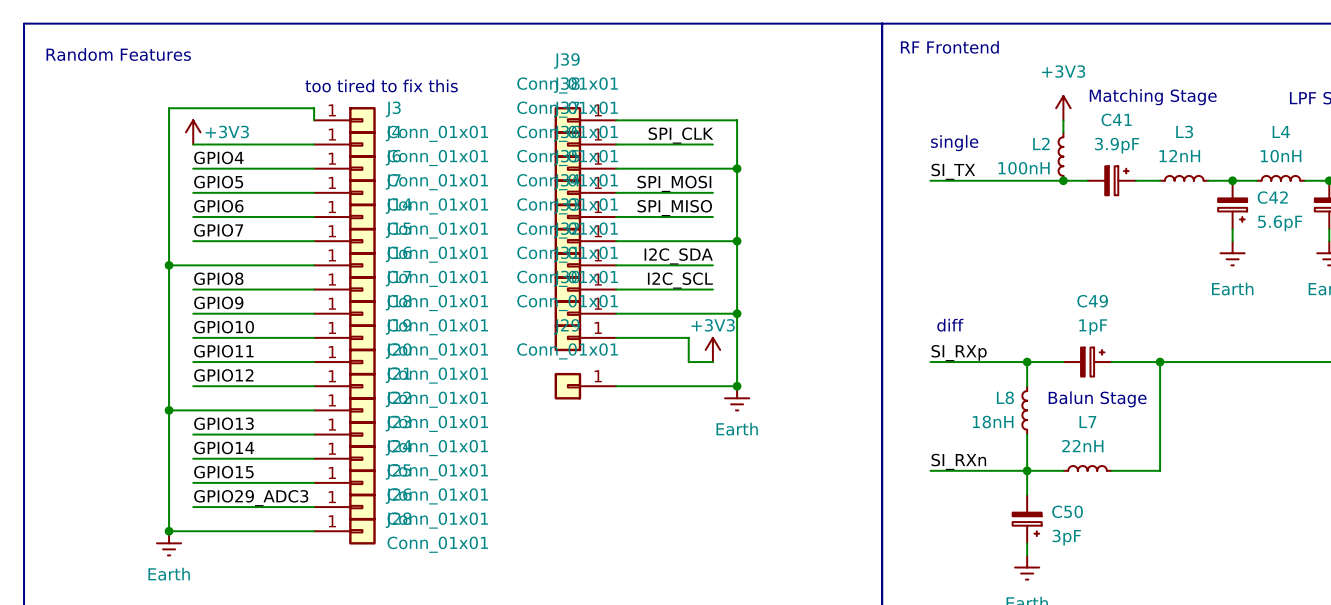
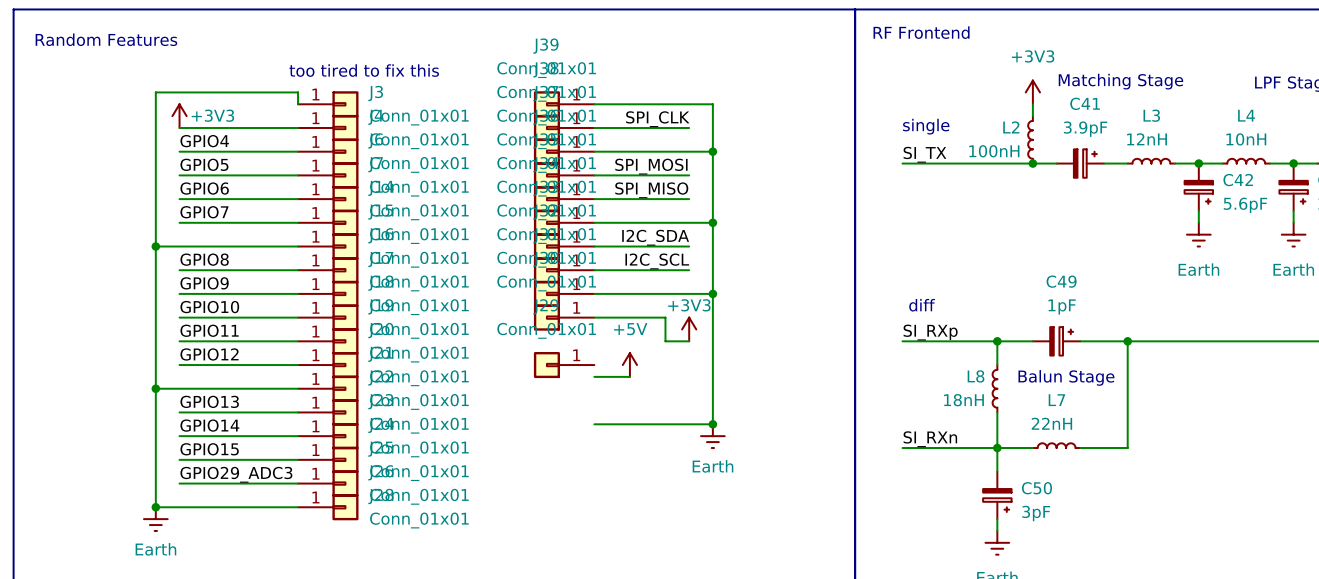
wire: (616, 386) (737, 386) -> (594, 424) (712, 424) (712, 365)
power symbol: none -> +5V (629, 365)
junction: (737, 386) -> none
wire: none -> (594, 376) (629, 376)
power symbol position: Earth (737, 398) -> Earth (712, 436)
junction: none -> (712, 424)

